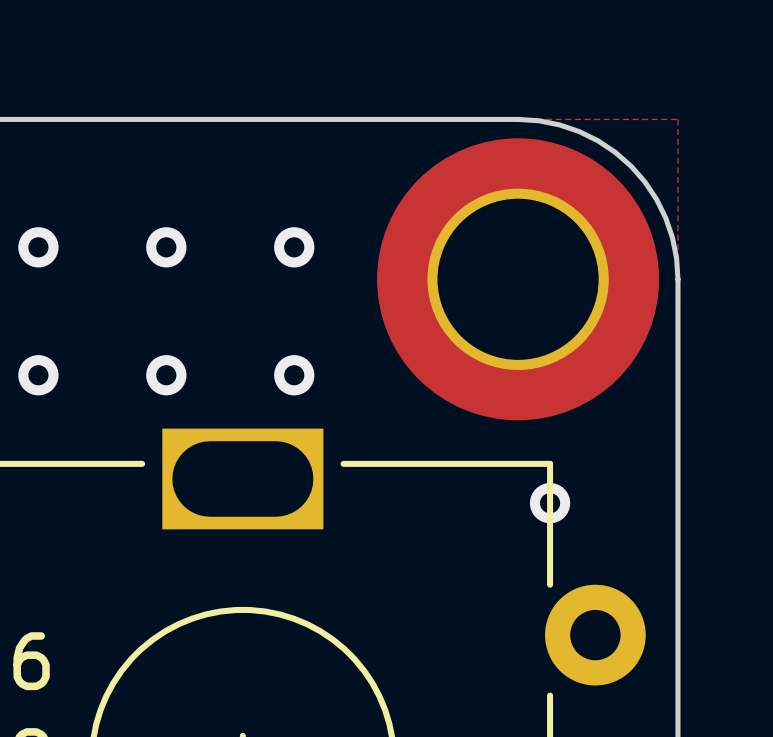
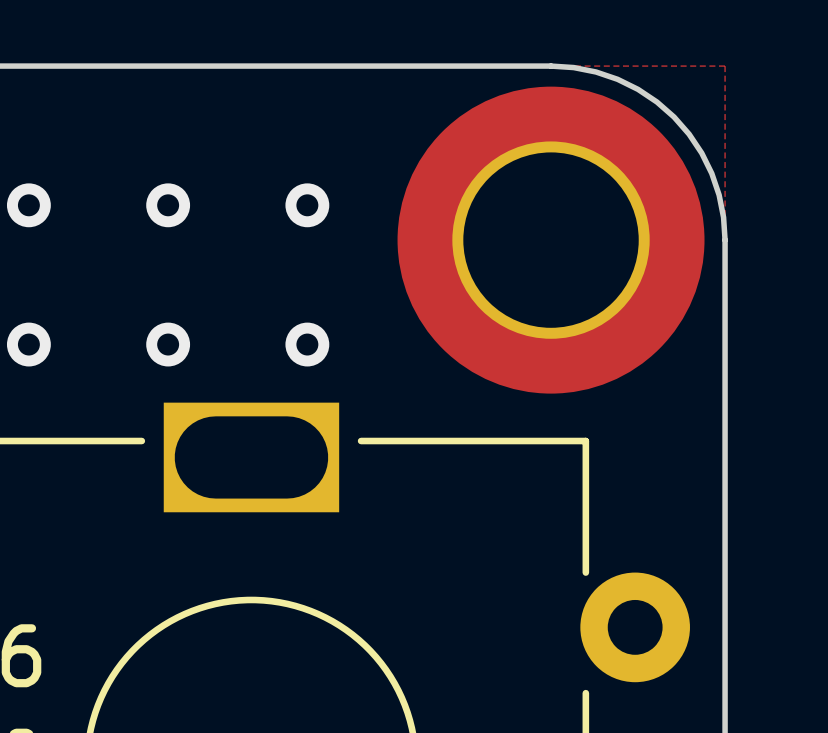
via: (550, 503) -> none

